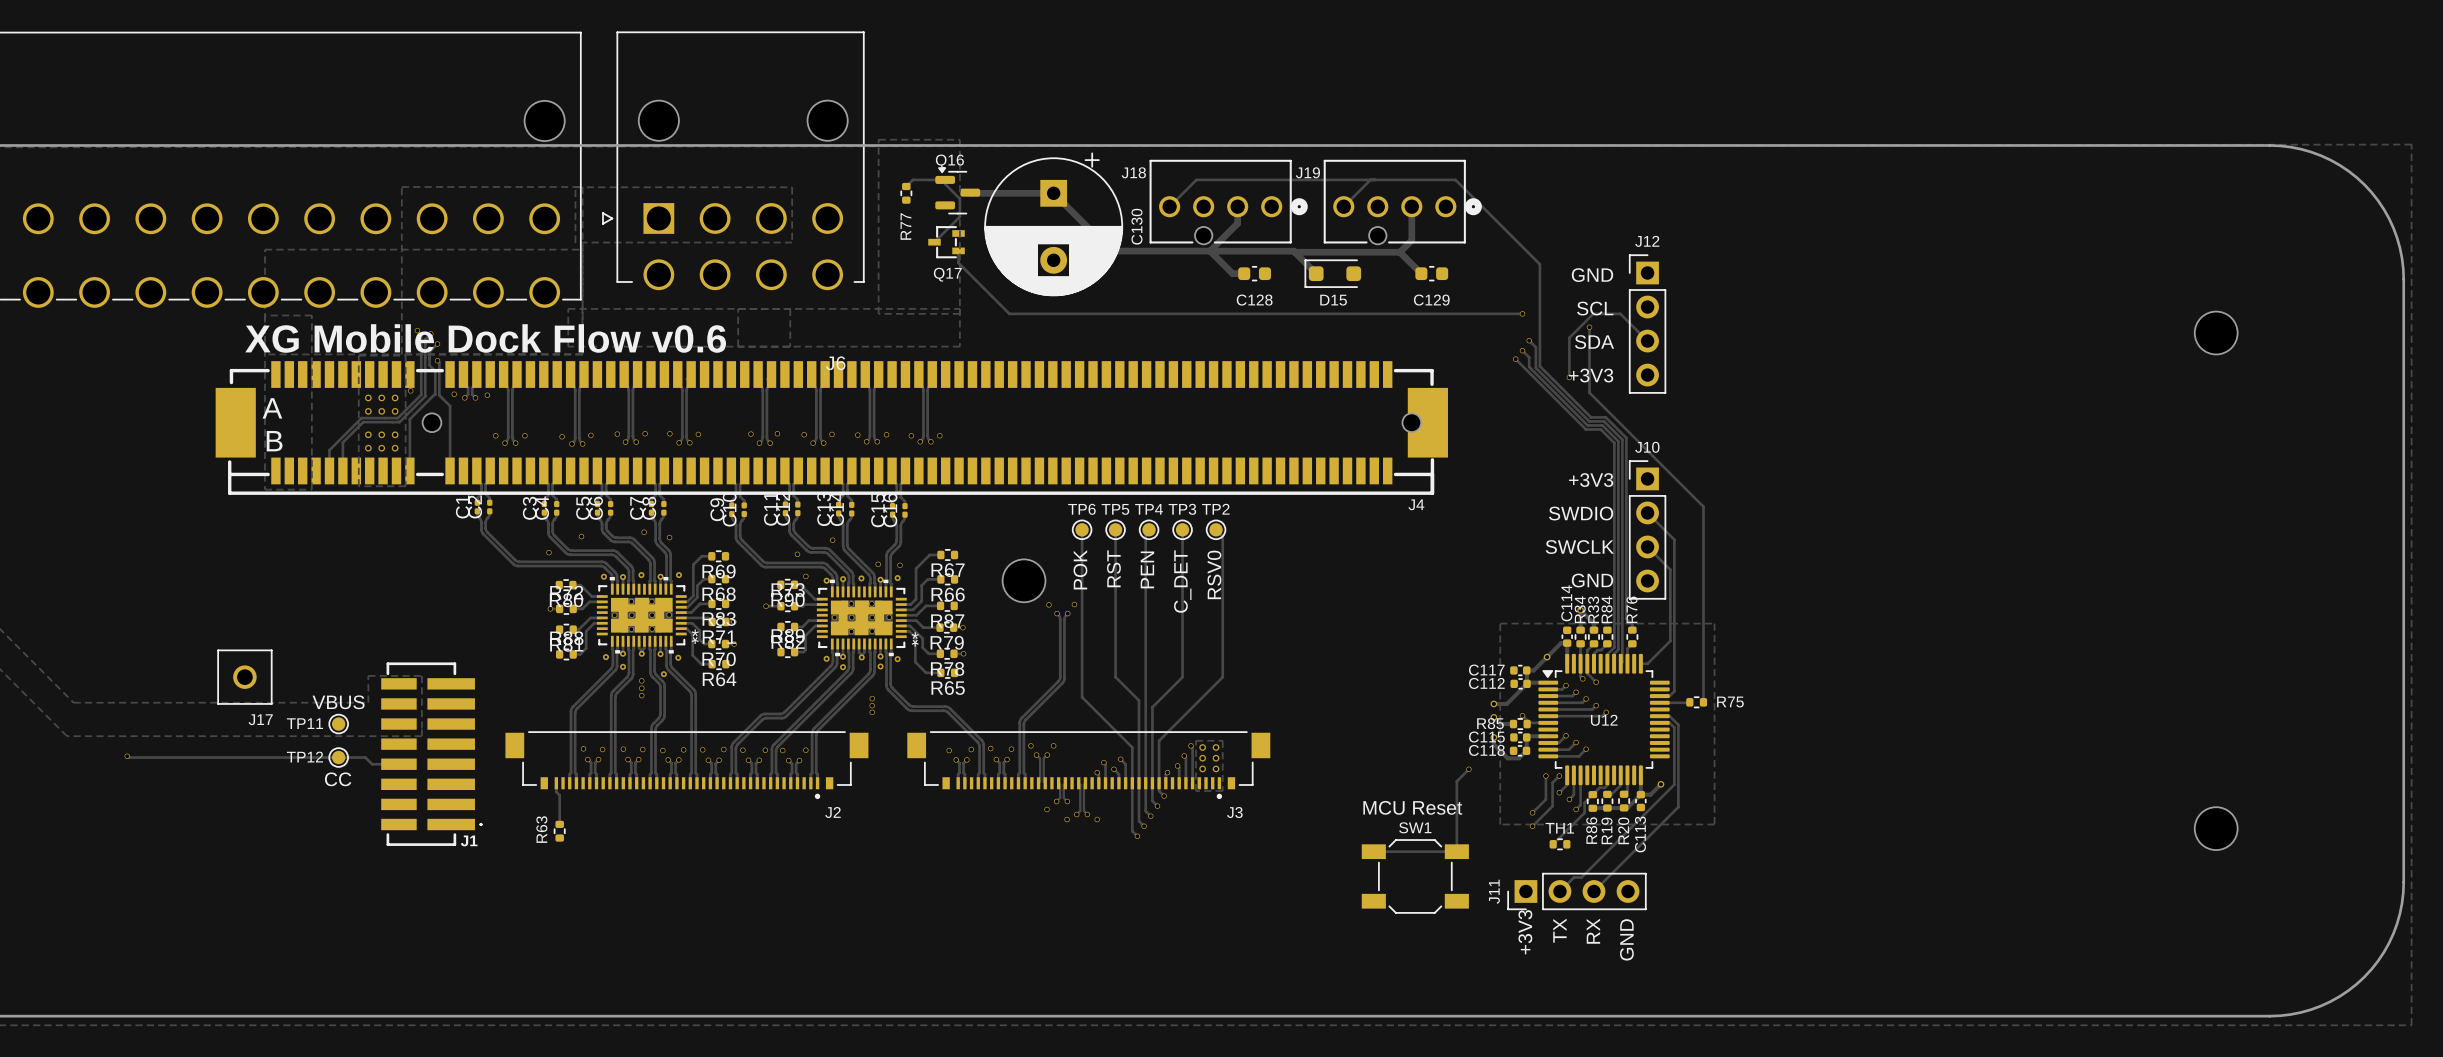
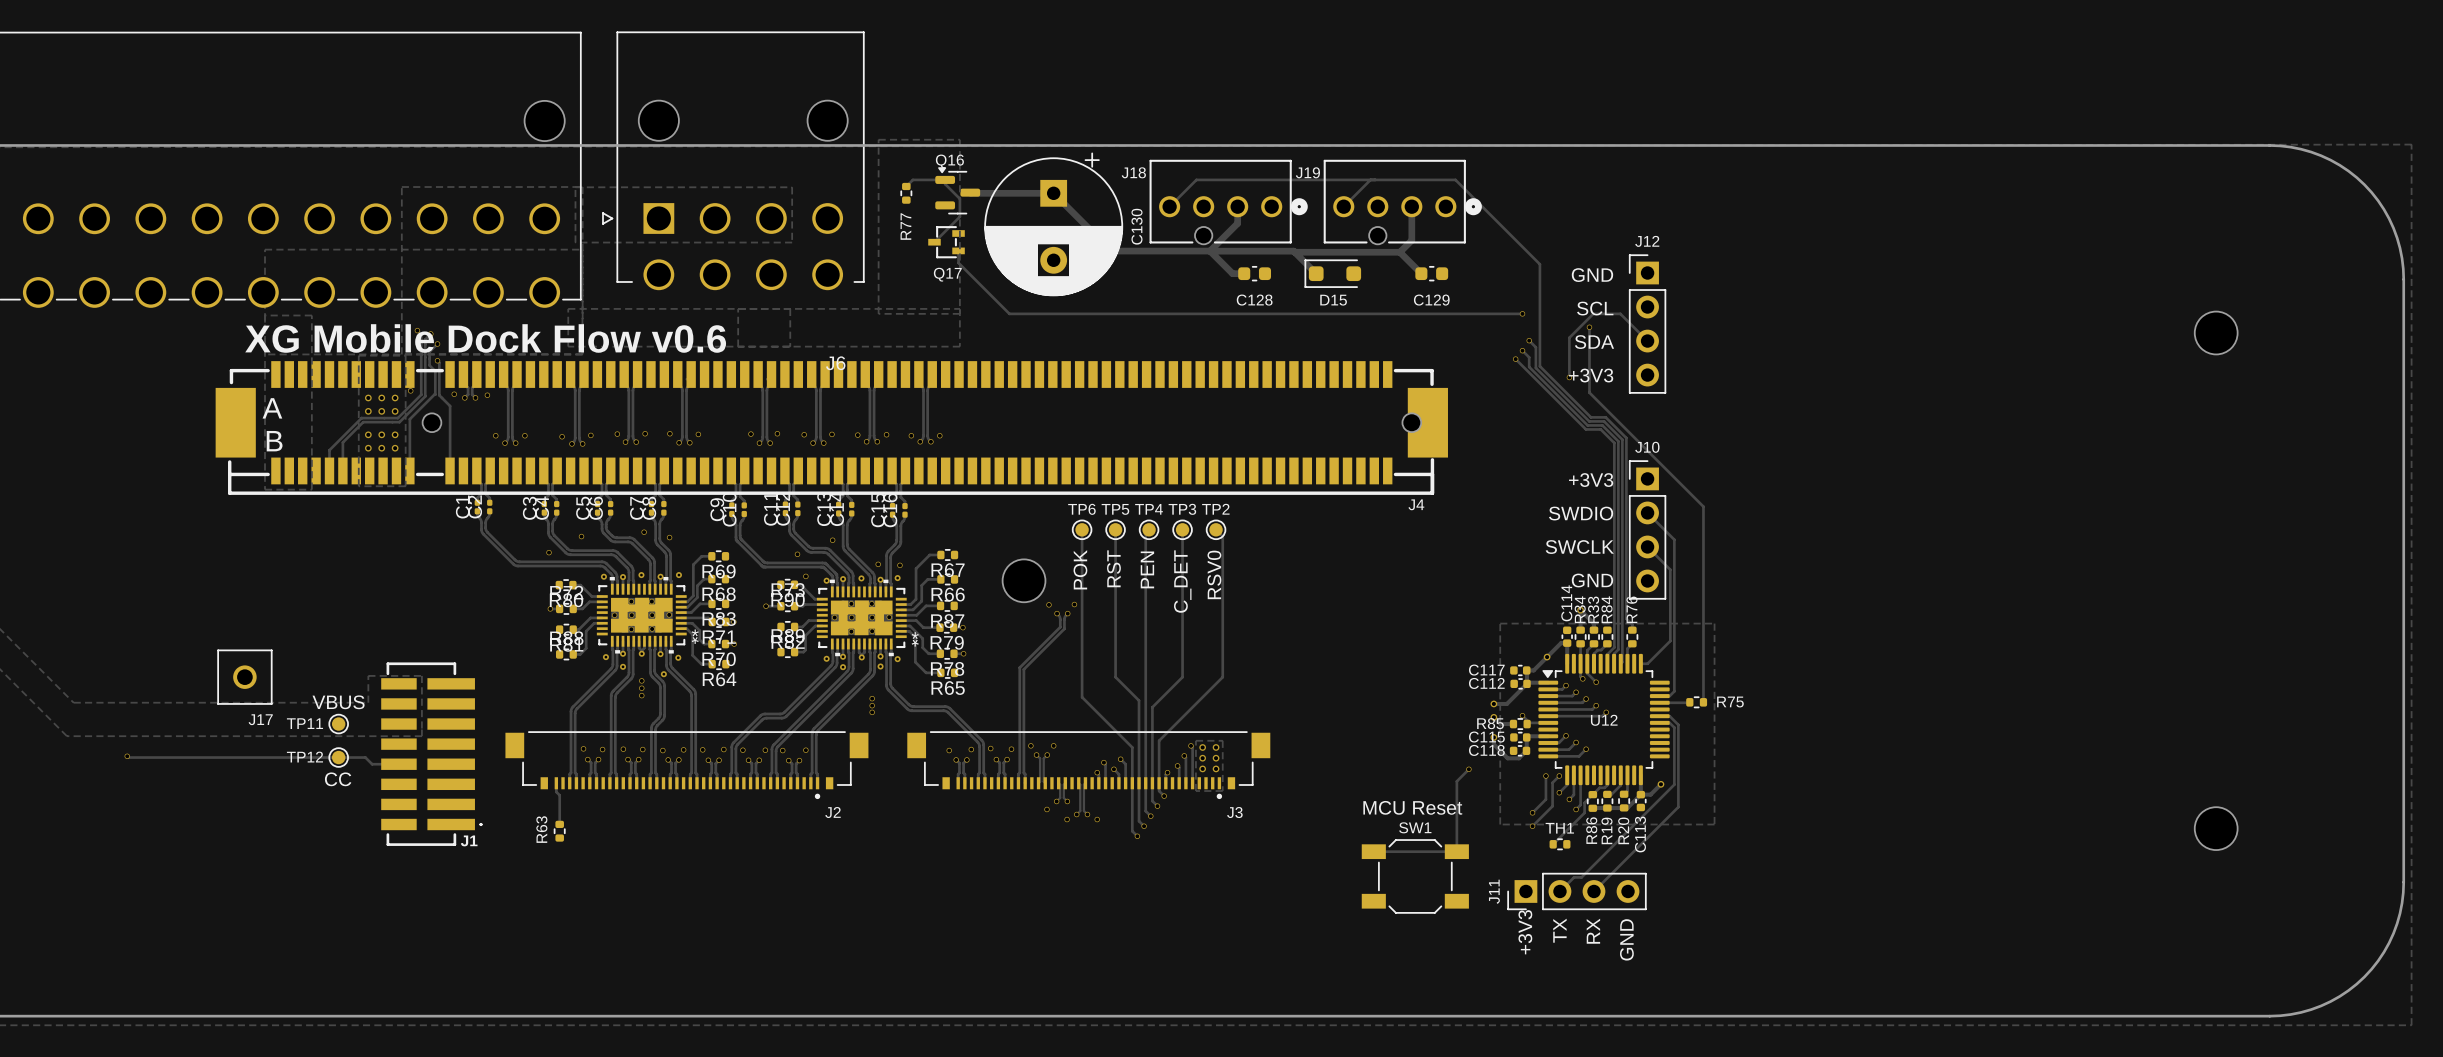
track: (1060, 627) (1059, 679) (1021, 718) (1019, 722) -> (1060, 627) (1019, 667) (1019, 722)
track: (1064, 628) (1063, 680) (1025, 719) (1023, 724) -> (1064, 628) (1023, 669) (1023, 724)

